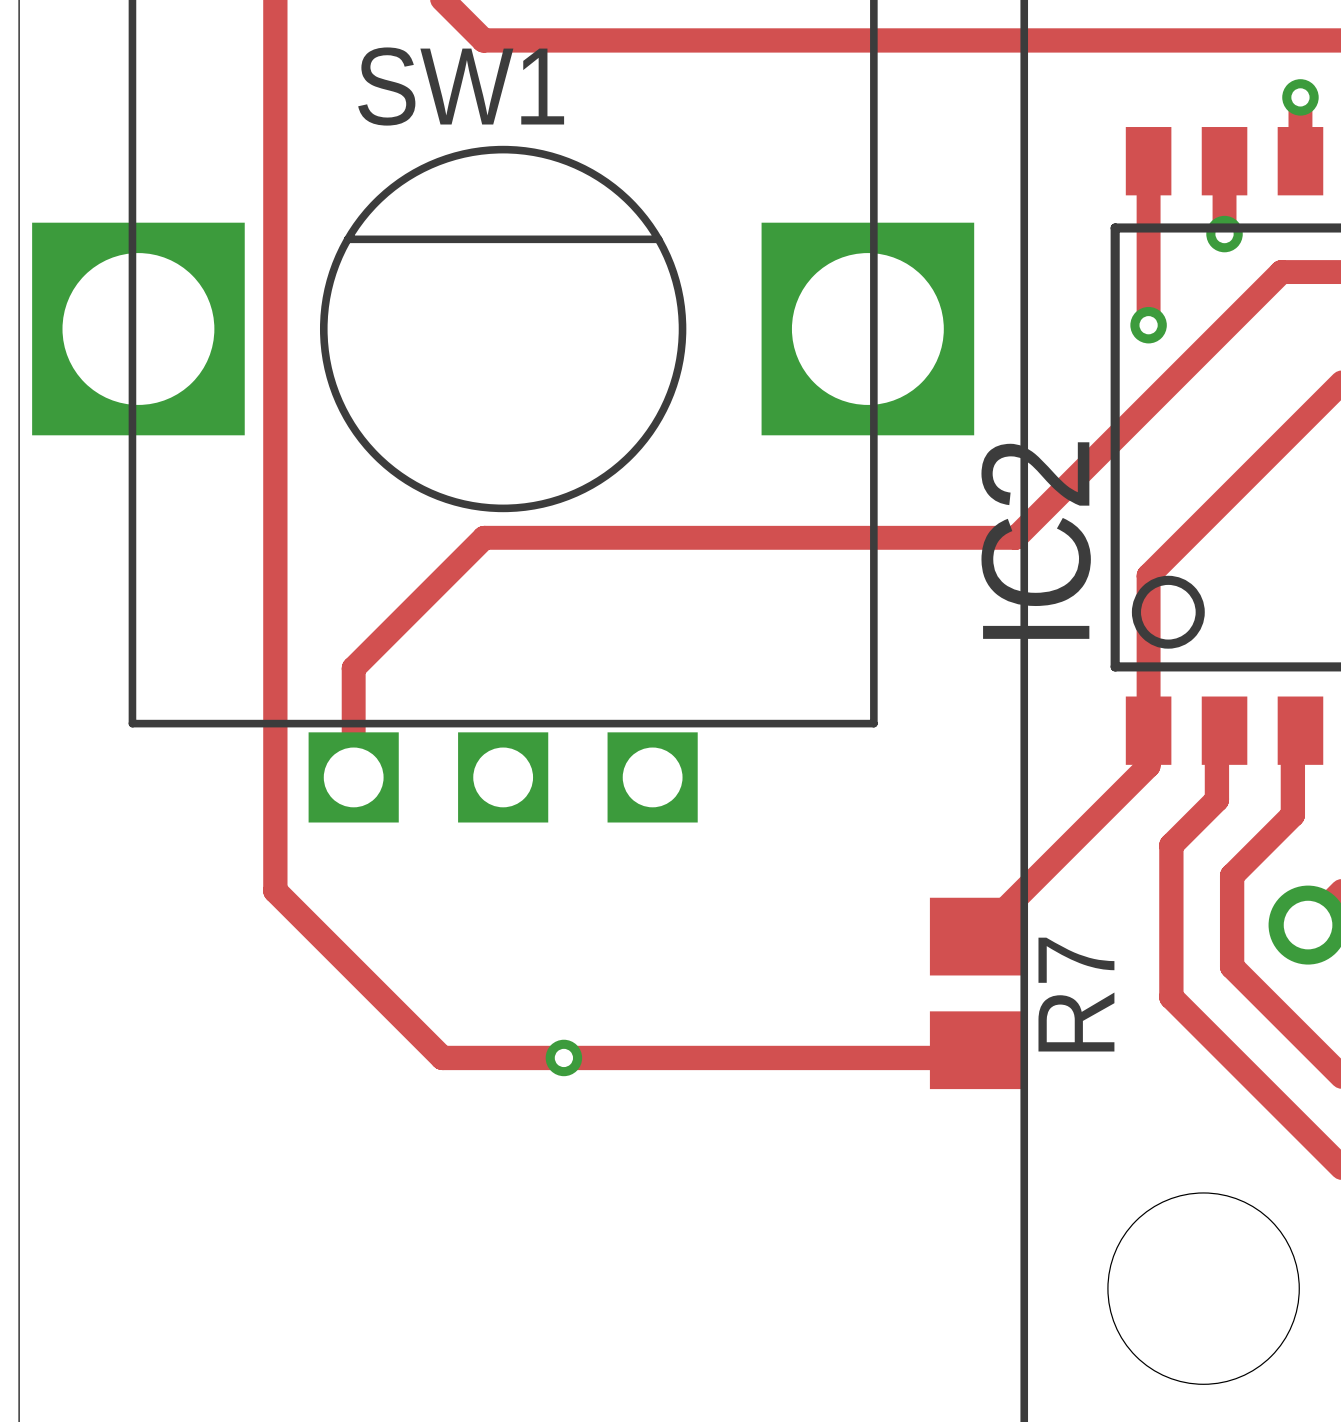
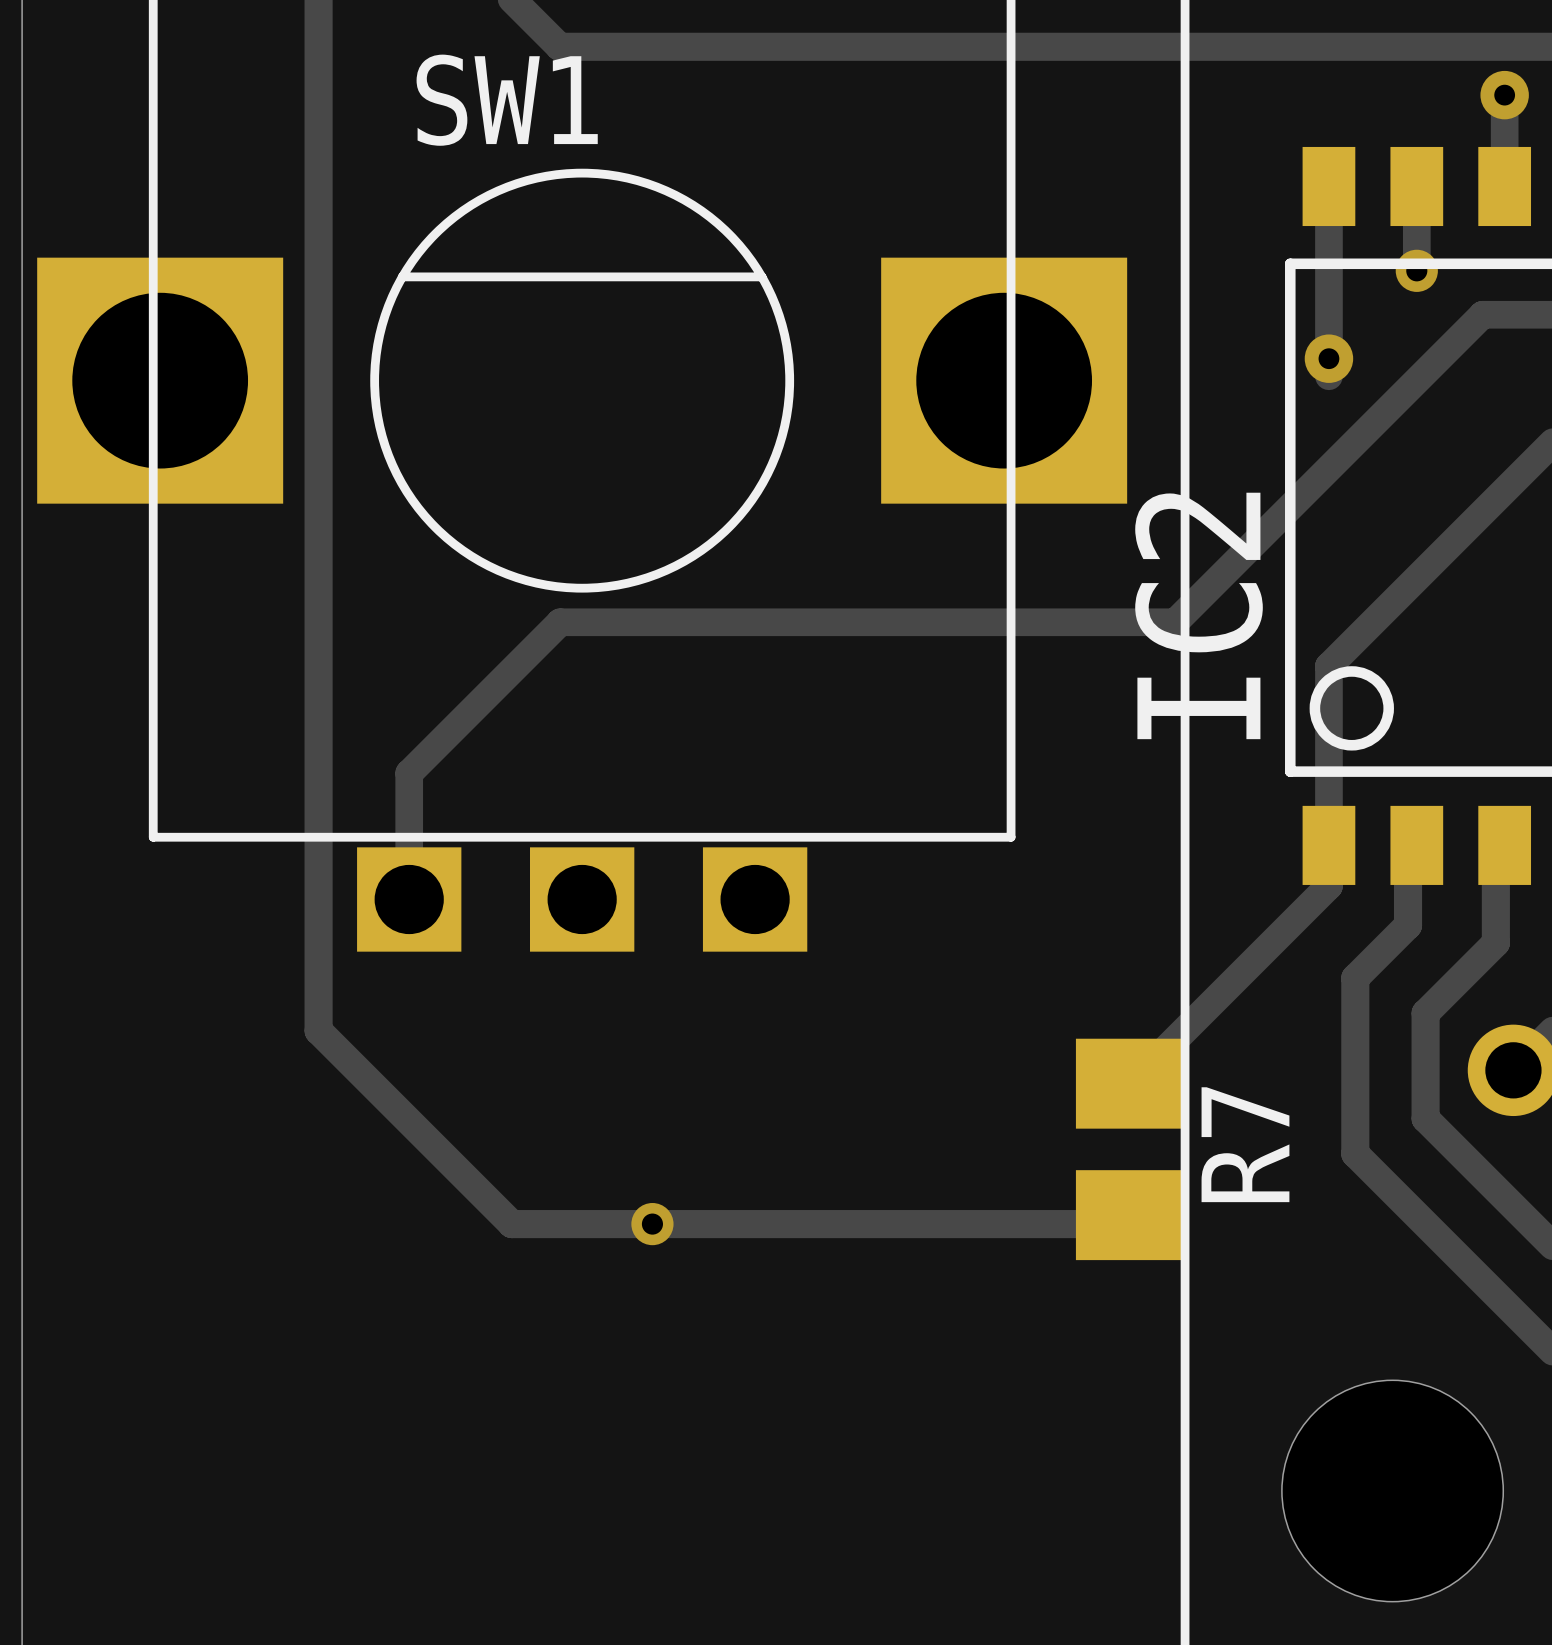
via position: (1300, 97) -> (1504, 95)
via position: (1148, 325) -> (1328, 358)

